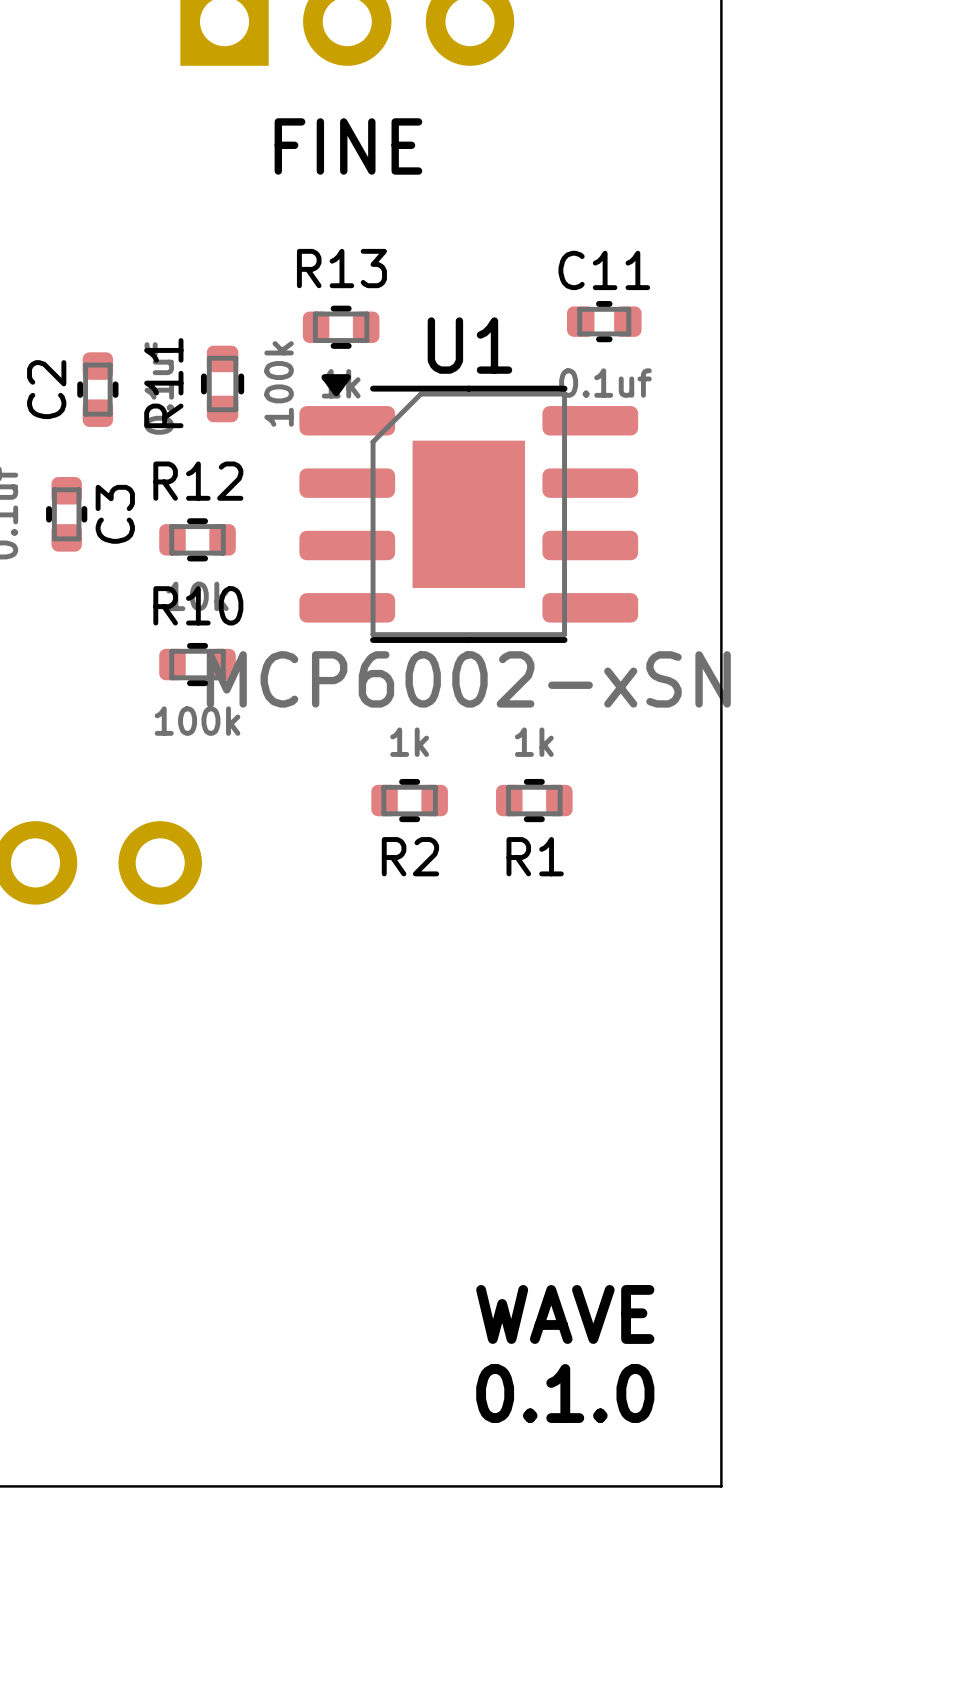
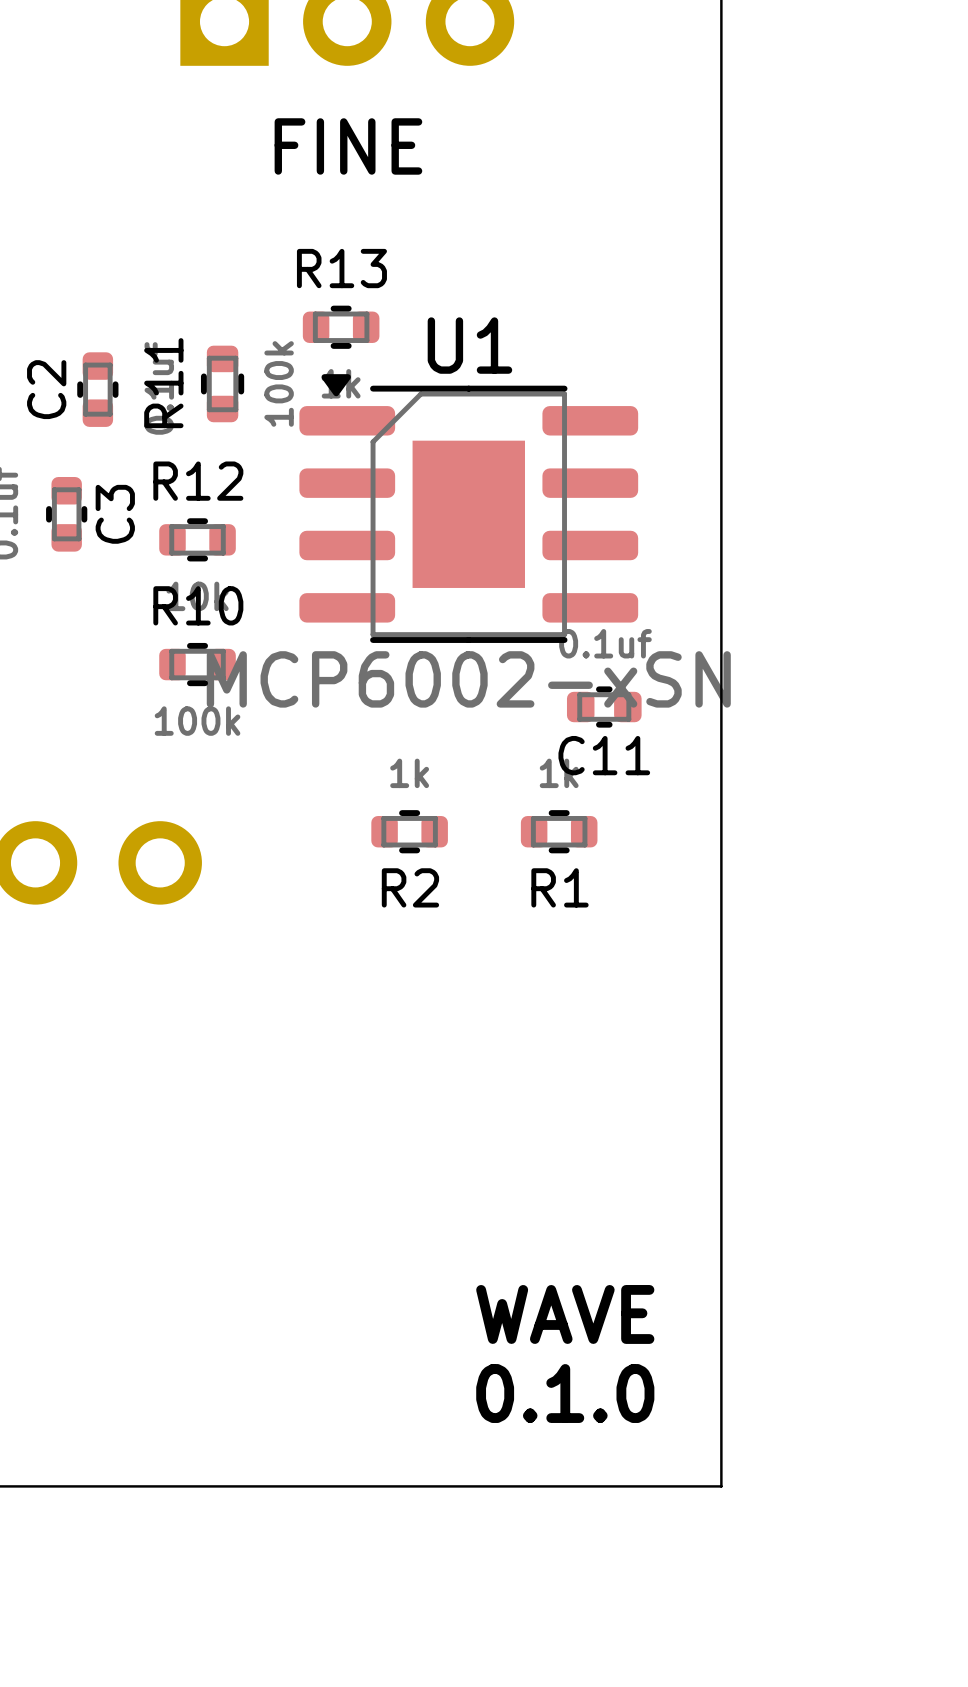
C11 name position: C11 (604, 270) -> C11 (604, 755)
C11 position: (604, 321) -> (604, 707)
C11 value position: 0.1uf (605, 383) -> 0.1uf (605, 643)
R2 position: (409, 800) -> (409, 831)
R1 position: (534, 800) -> (559, 831)

